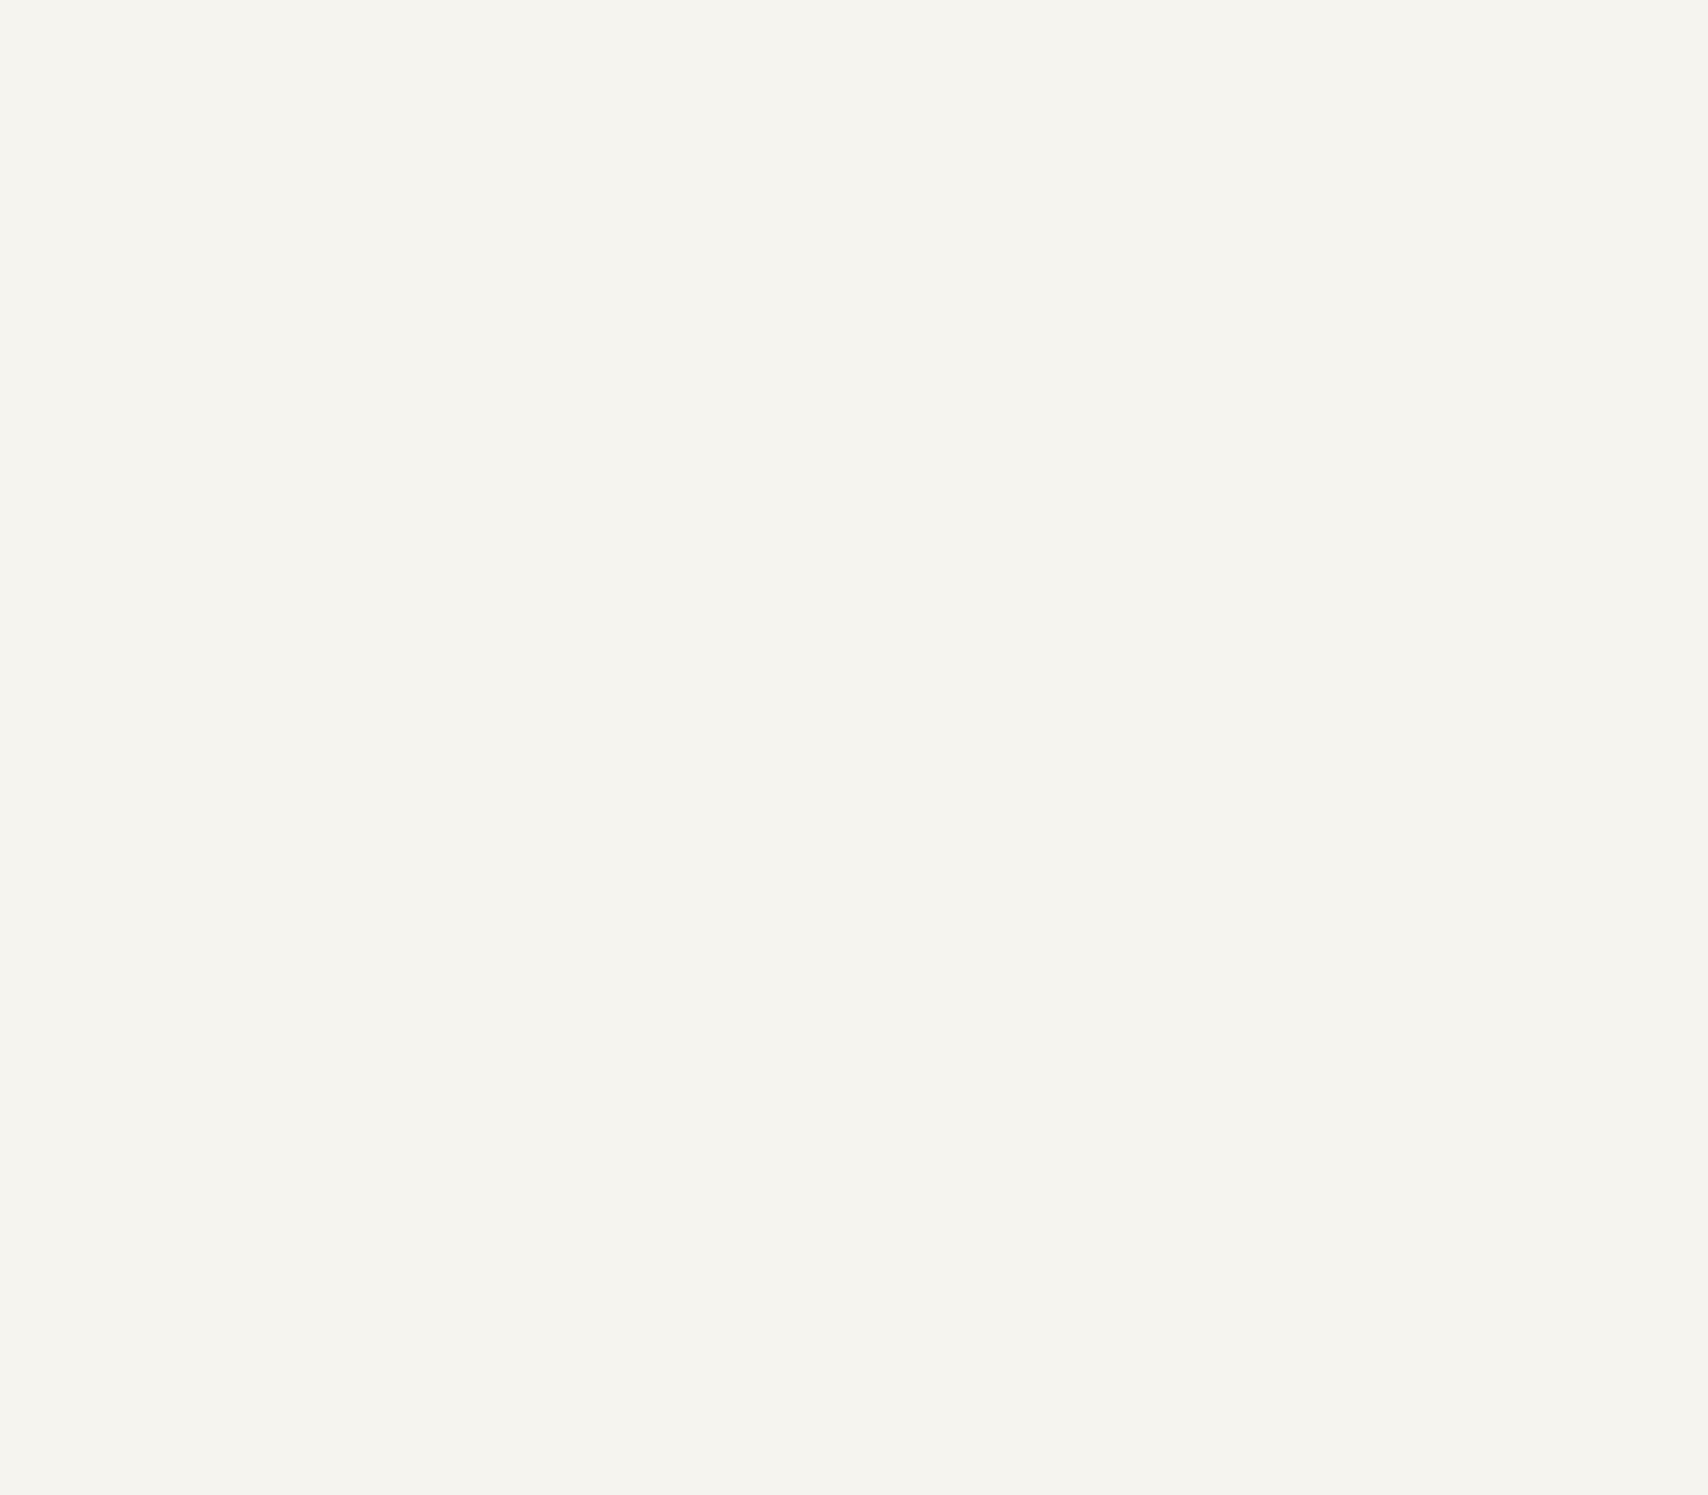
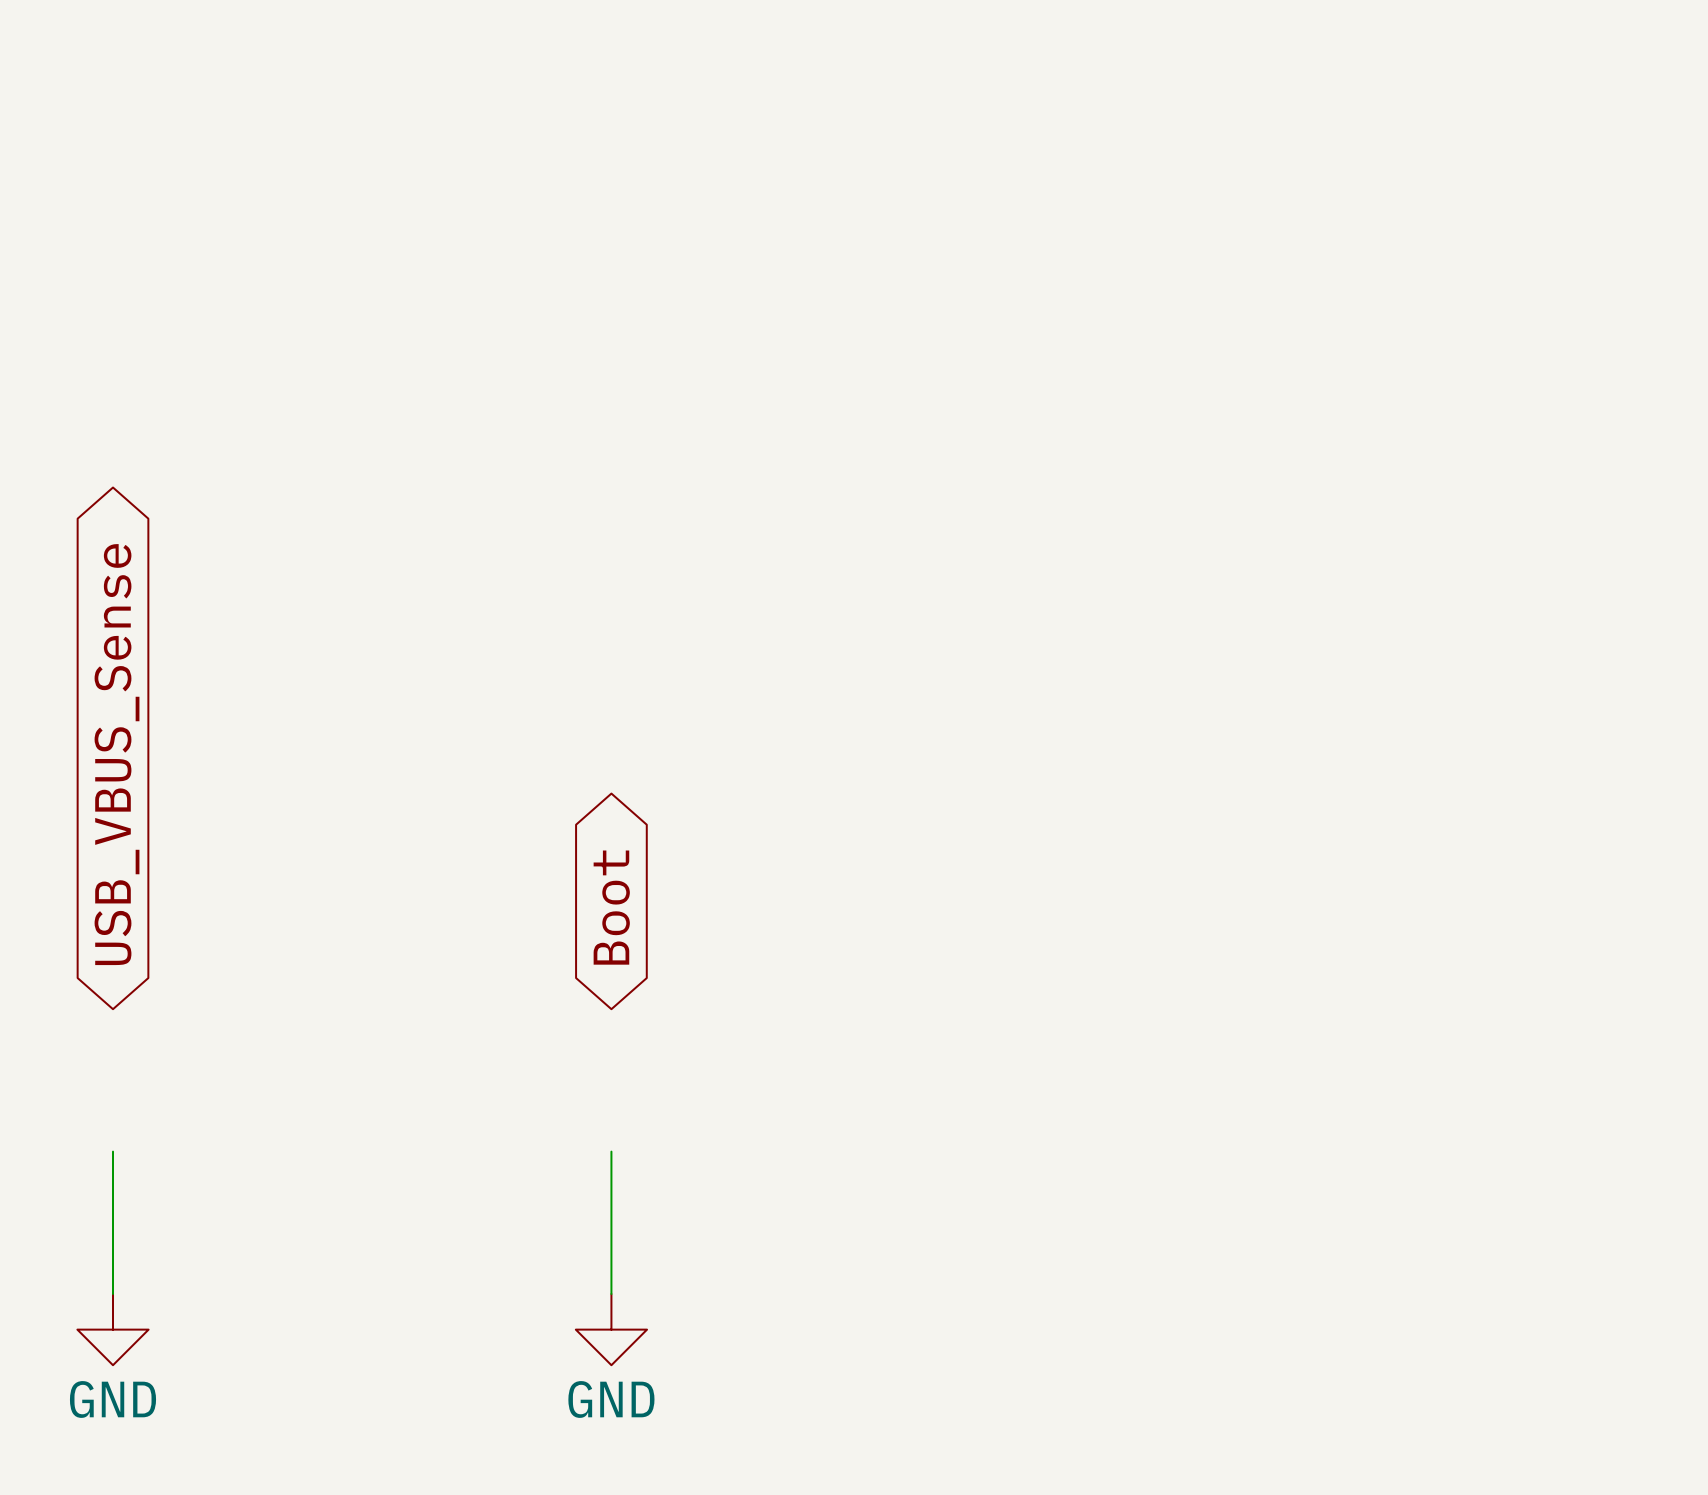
global label: none -> USB_VBUS_Sense (117, 754)
global label: none -> Boot (611, 907)
wire: none -> (113, 1151) (113, 1294)
wire: none -> (611, 1151) (611, 1294)
power symbol: none -> GND (113, 1329)
power symbol: none -> GND (611, 1329)

